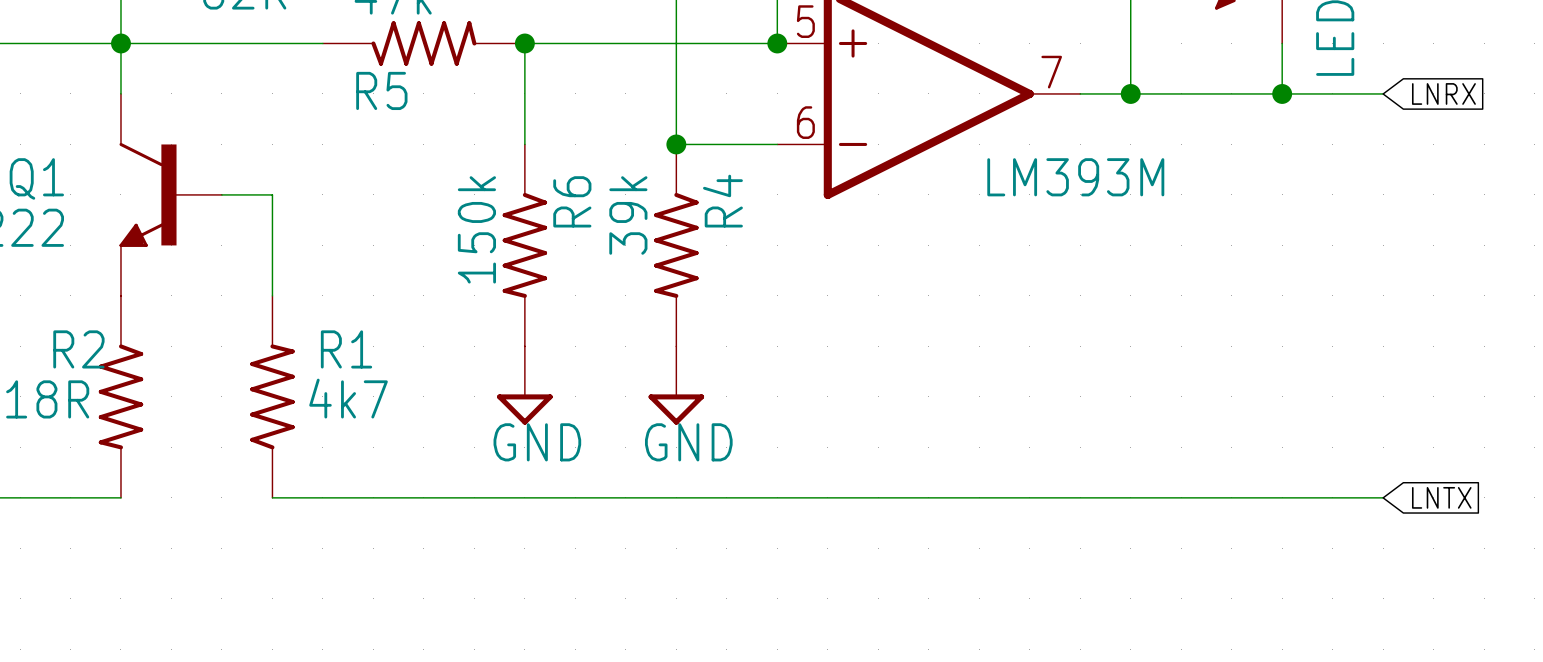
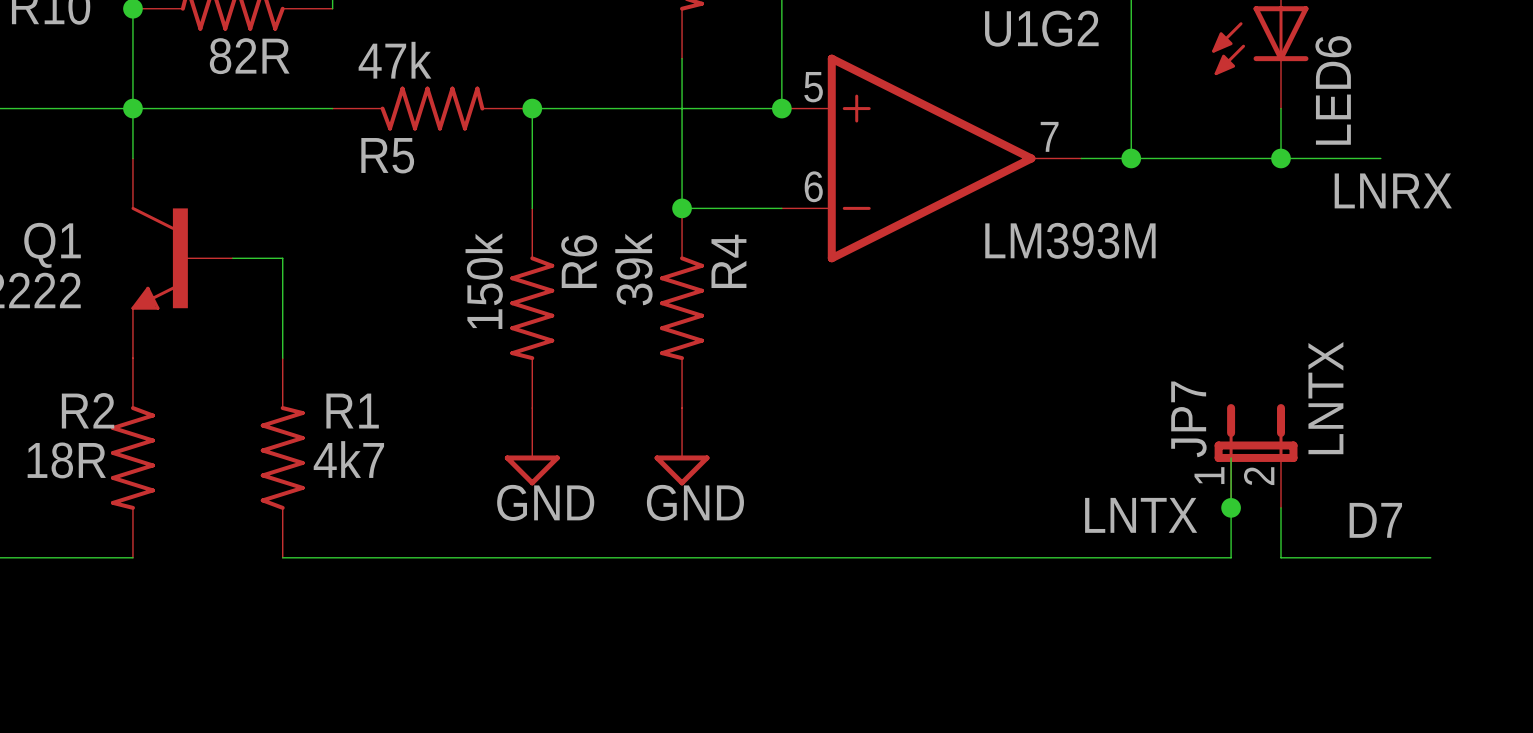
global label: LNRX (1443, 93) -> none
label: none -> LNRX (1393, 190)
JP7: none -> LNTX (1256, 455)
wire: none -> (1231, 457) (1231, 557)
junction: none -> (1231, 507)
label: none -> LNTX (1141, 515)
label: none -> D7 (1375, 520)
wire: (1231, 497) (1282, 497) -> (1281, 507) (1281, 557)
wire: none -> (1380, 557) (1430, 557)
global label: LNTX (1441, 497) -> none

